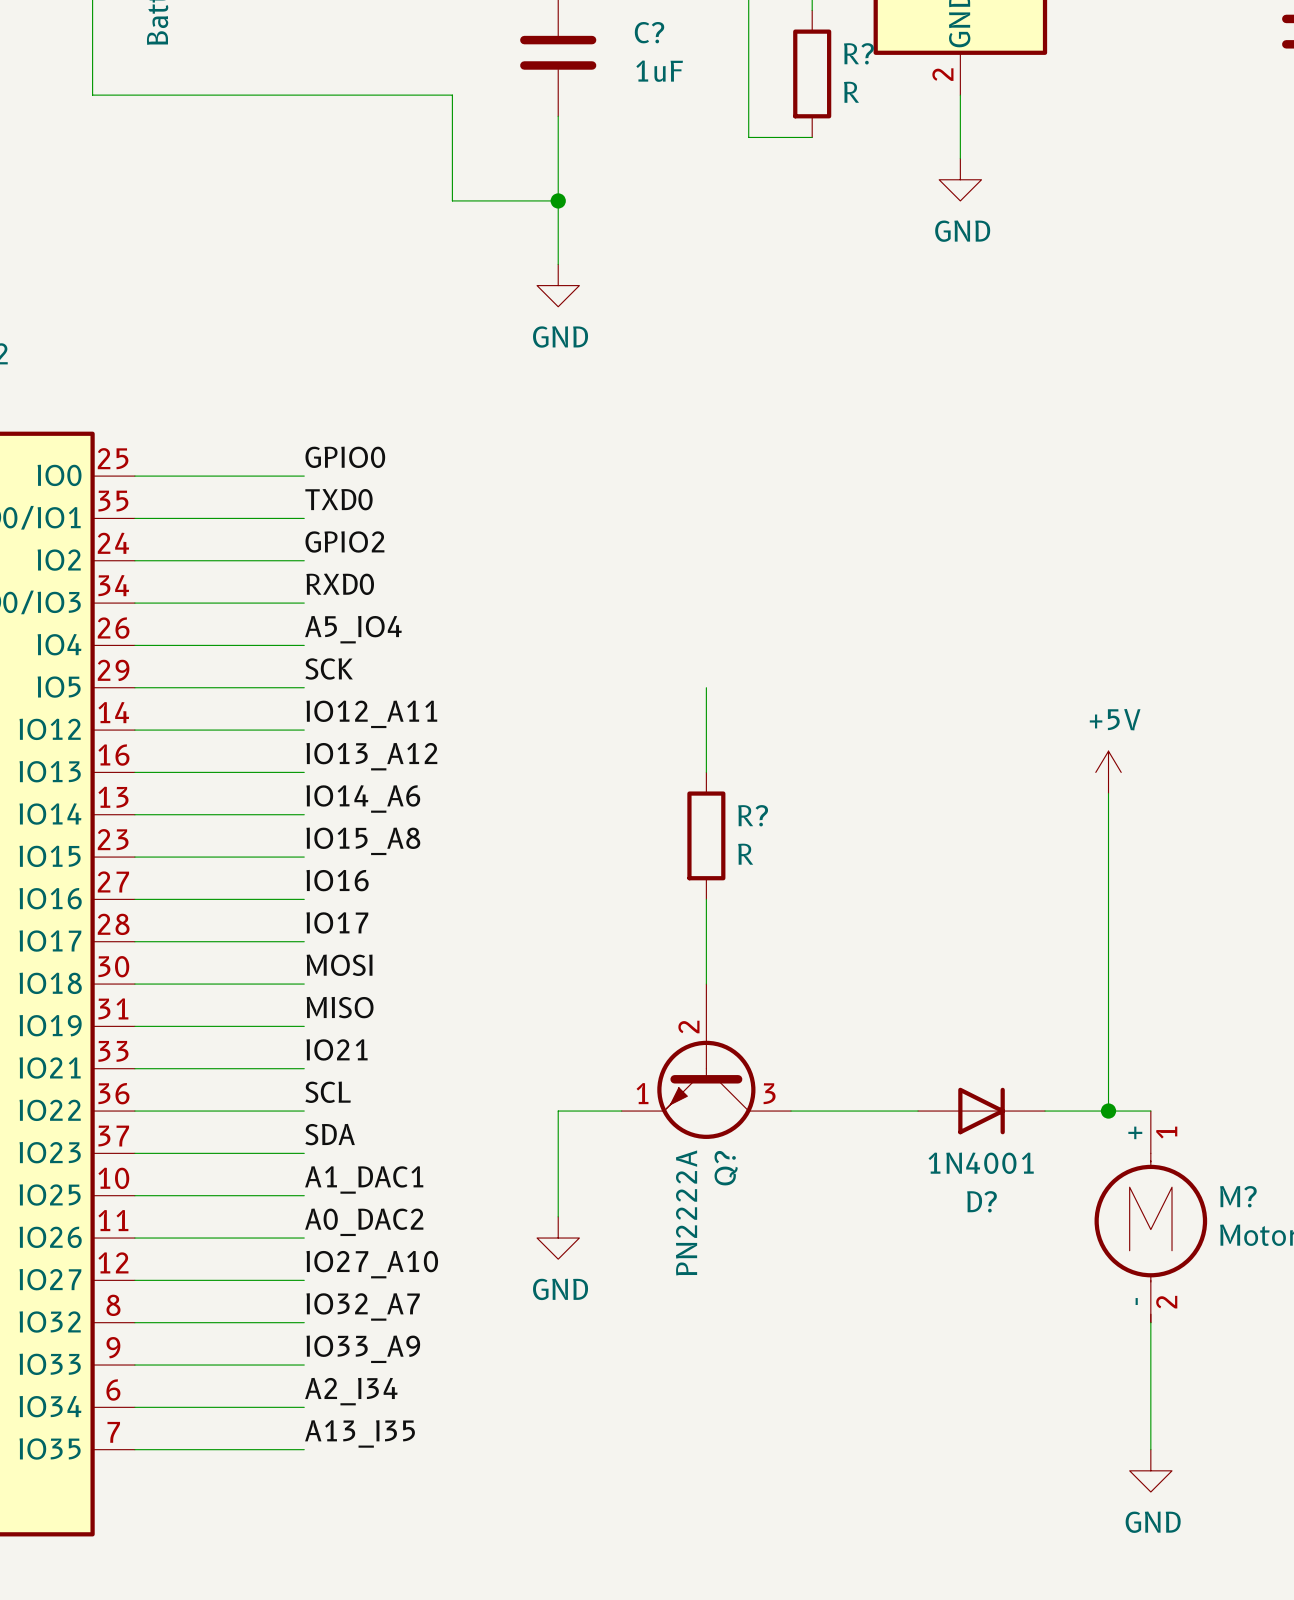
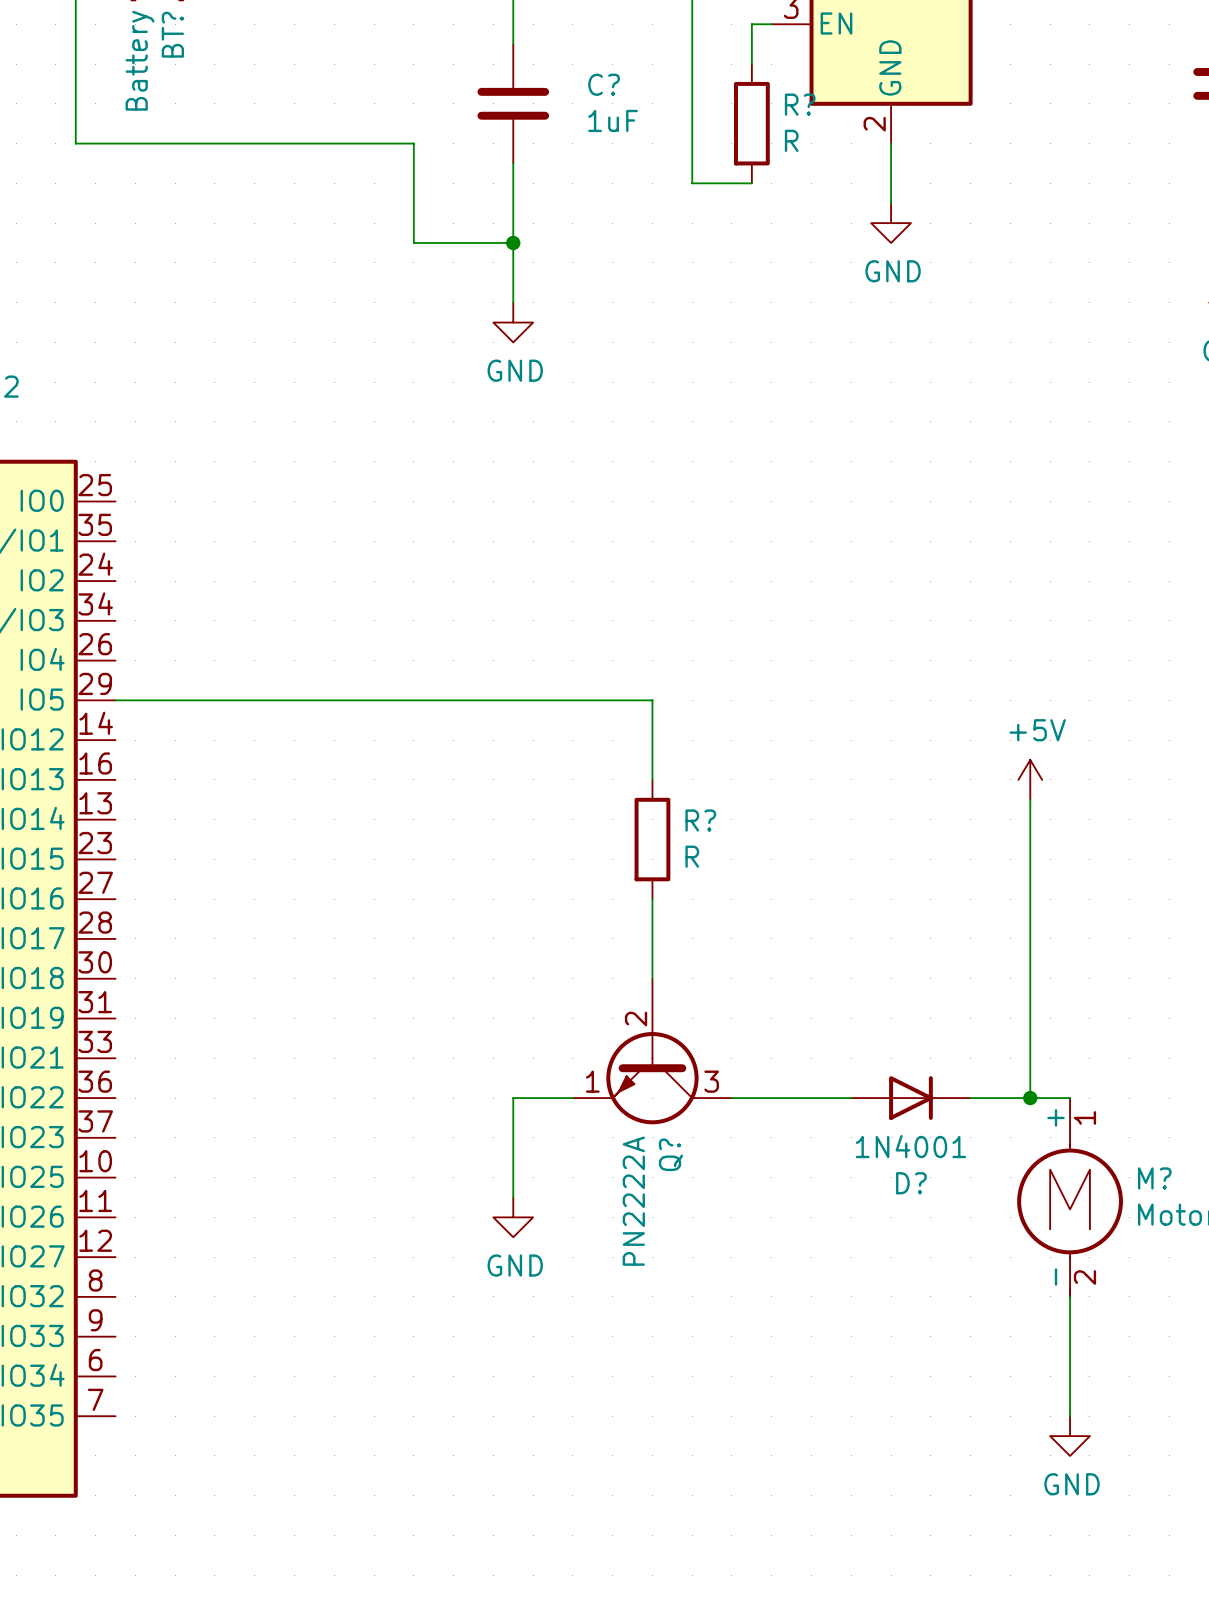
label: GPIO0 (345, 457) -> none
wire: (134, 476) (304, 476) -> none
label: TXD0 (338, 499) -> none
wire: (134, 518) (304, 518) -> none
label: GPIO2 (344, 541) -> none
wire: (134, 560) (304, 560) -> none
label: RXD0 (340, 584) -> none
wire: (134, 603) (304, 603) -> none
label: A5_IO4 (353, 629) -> none
wire: (134, 645) (304, 645) -> none
label: SCK (329, 668) -> none
wire: none -> (274, 700) (652, 700)
label: IO12_A11 (371, 714) -> none
wire: (134, 730) (304, 730) -> none
label: IO13_A12 (371, 756) -> none
wire: (134, 772) (304, 772) -> none
label: IO14_A6 (363, 799) -> none
wire: (134, 814) (304, 814) -> none
label: IO15_A8 (363, 841) -> none
wire: (134, 857) (304, 857) -> none
label: IO16 (337, 880) -> none
wire: (134, 899) (304, 899) -> none
label: IO17 (337, 922) -> none
wire: (134, 941) (304, 941) -> none
label: MOSI (339, 965) -> none
wire: (134, 984) (304, 984) -> none
label: MISO (340, 1007) -> none
wire: (134, 1026) (304, 1026) -> none
label: IO21 (337, 1049) -> none
wire: (134, 1068) (304, 1068) -> none
label: SCL (328, 1092) -> none
wire: (134, 1111) (304, 1111) -> none
label: SDA (330, 1134) -> none
wire: (134, 1153) (304, 1153) -> none
label: A1_DAC1 (364, 1179) -> none
wire: (134, 1195) (304, 1195) -> none
label: A0_DAC2 (364, 1222) -> none
wire: (134, 1238) (304, 1238) -> none
label: IO27_A10 (372, 1264) -> none
wire: (134, 1280) (304, 1280) -> none
label: IO32_A7 (363, 1306) -> none
wire: (134, 1322) (304, 1322) -> none
label: IO33_A9 (363, 1349) -> none
wire: (134, 1365) (304, 1365) -> none
label: A2_I34 (351, 1391) -> none
wire: (134, 1407) (304, 1407) -> none
label: A13_I35 (360, 1433) -> none
wire: (134, 1449) (304, 1449) -> none

